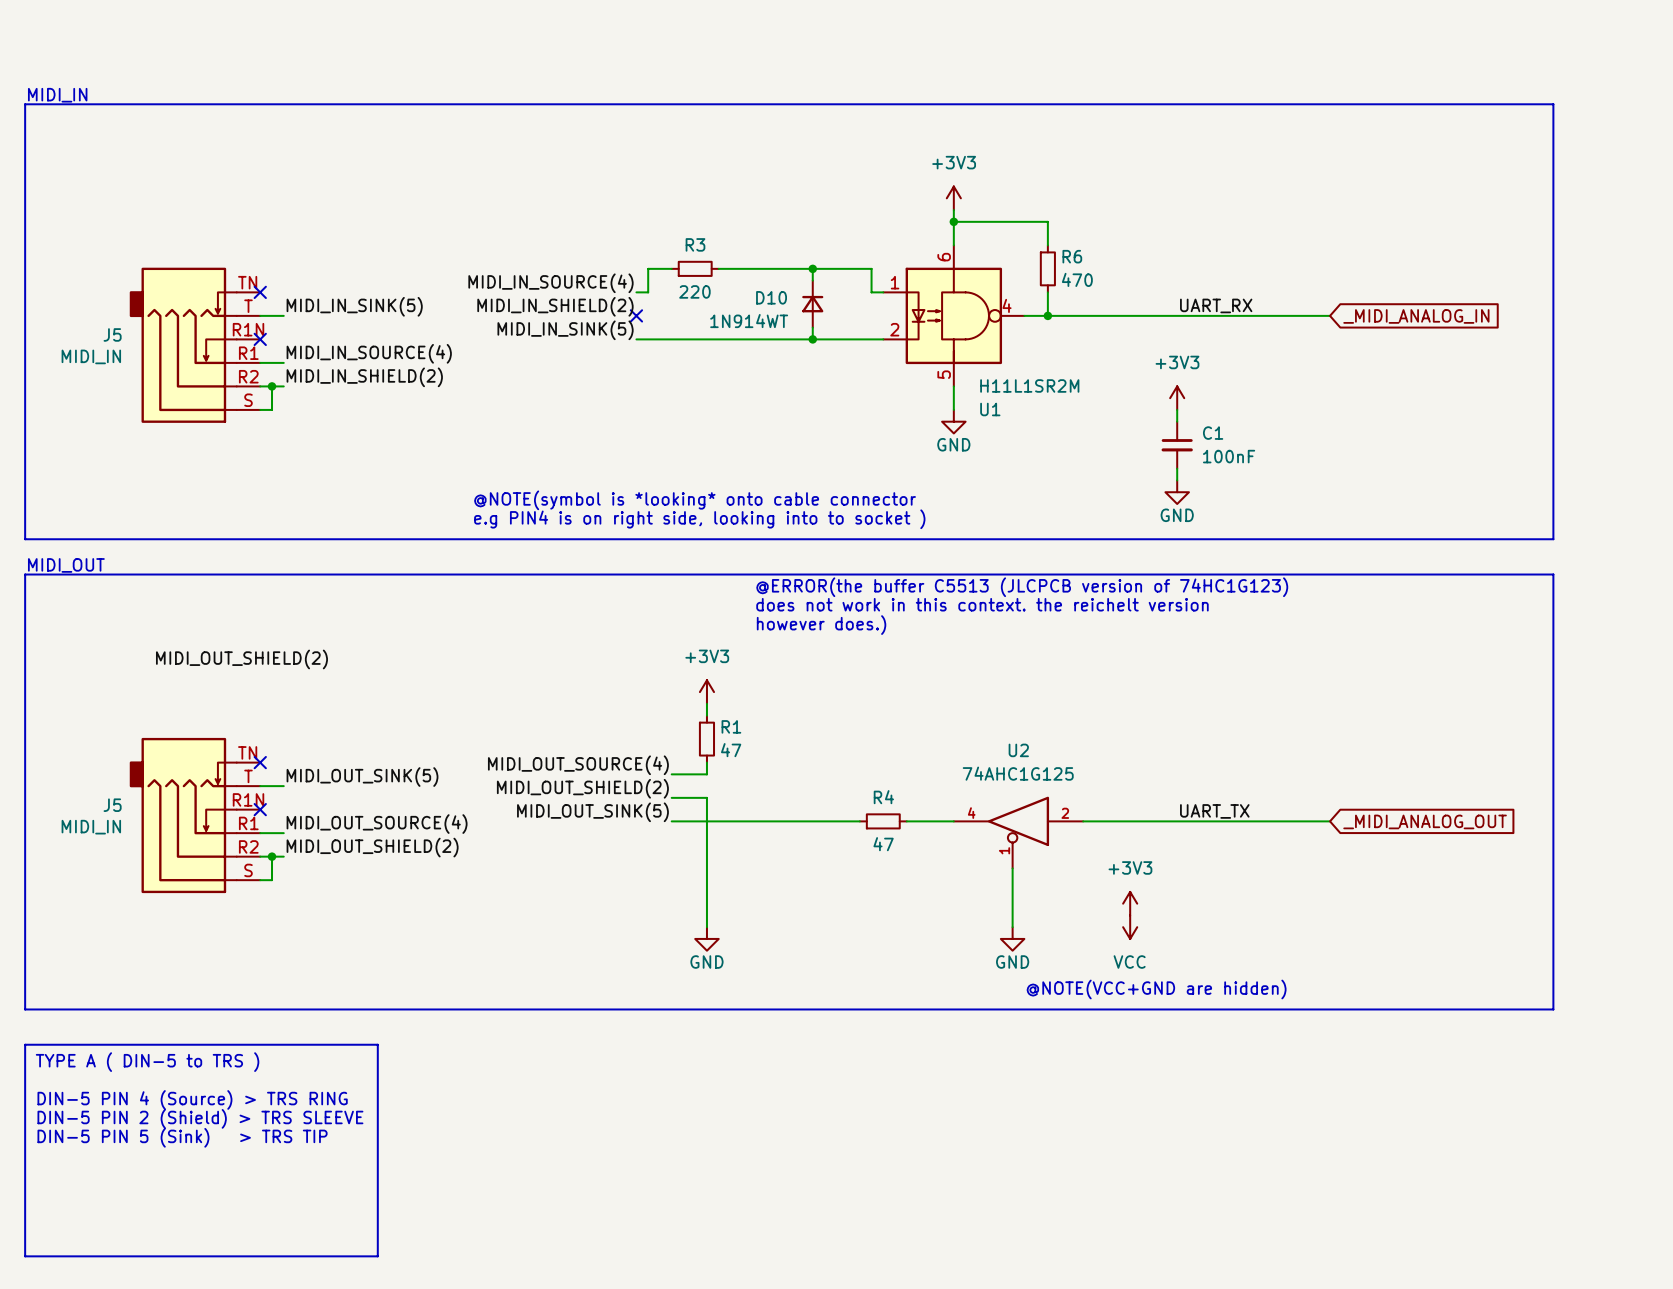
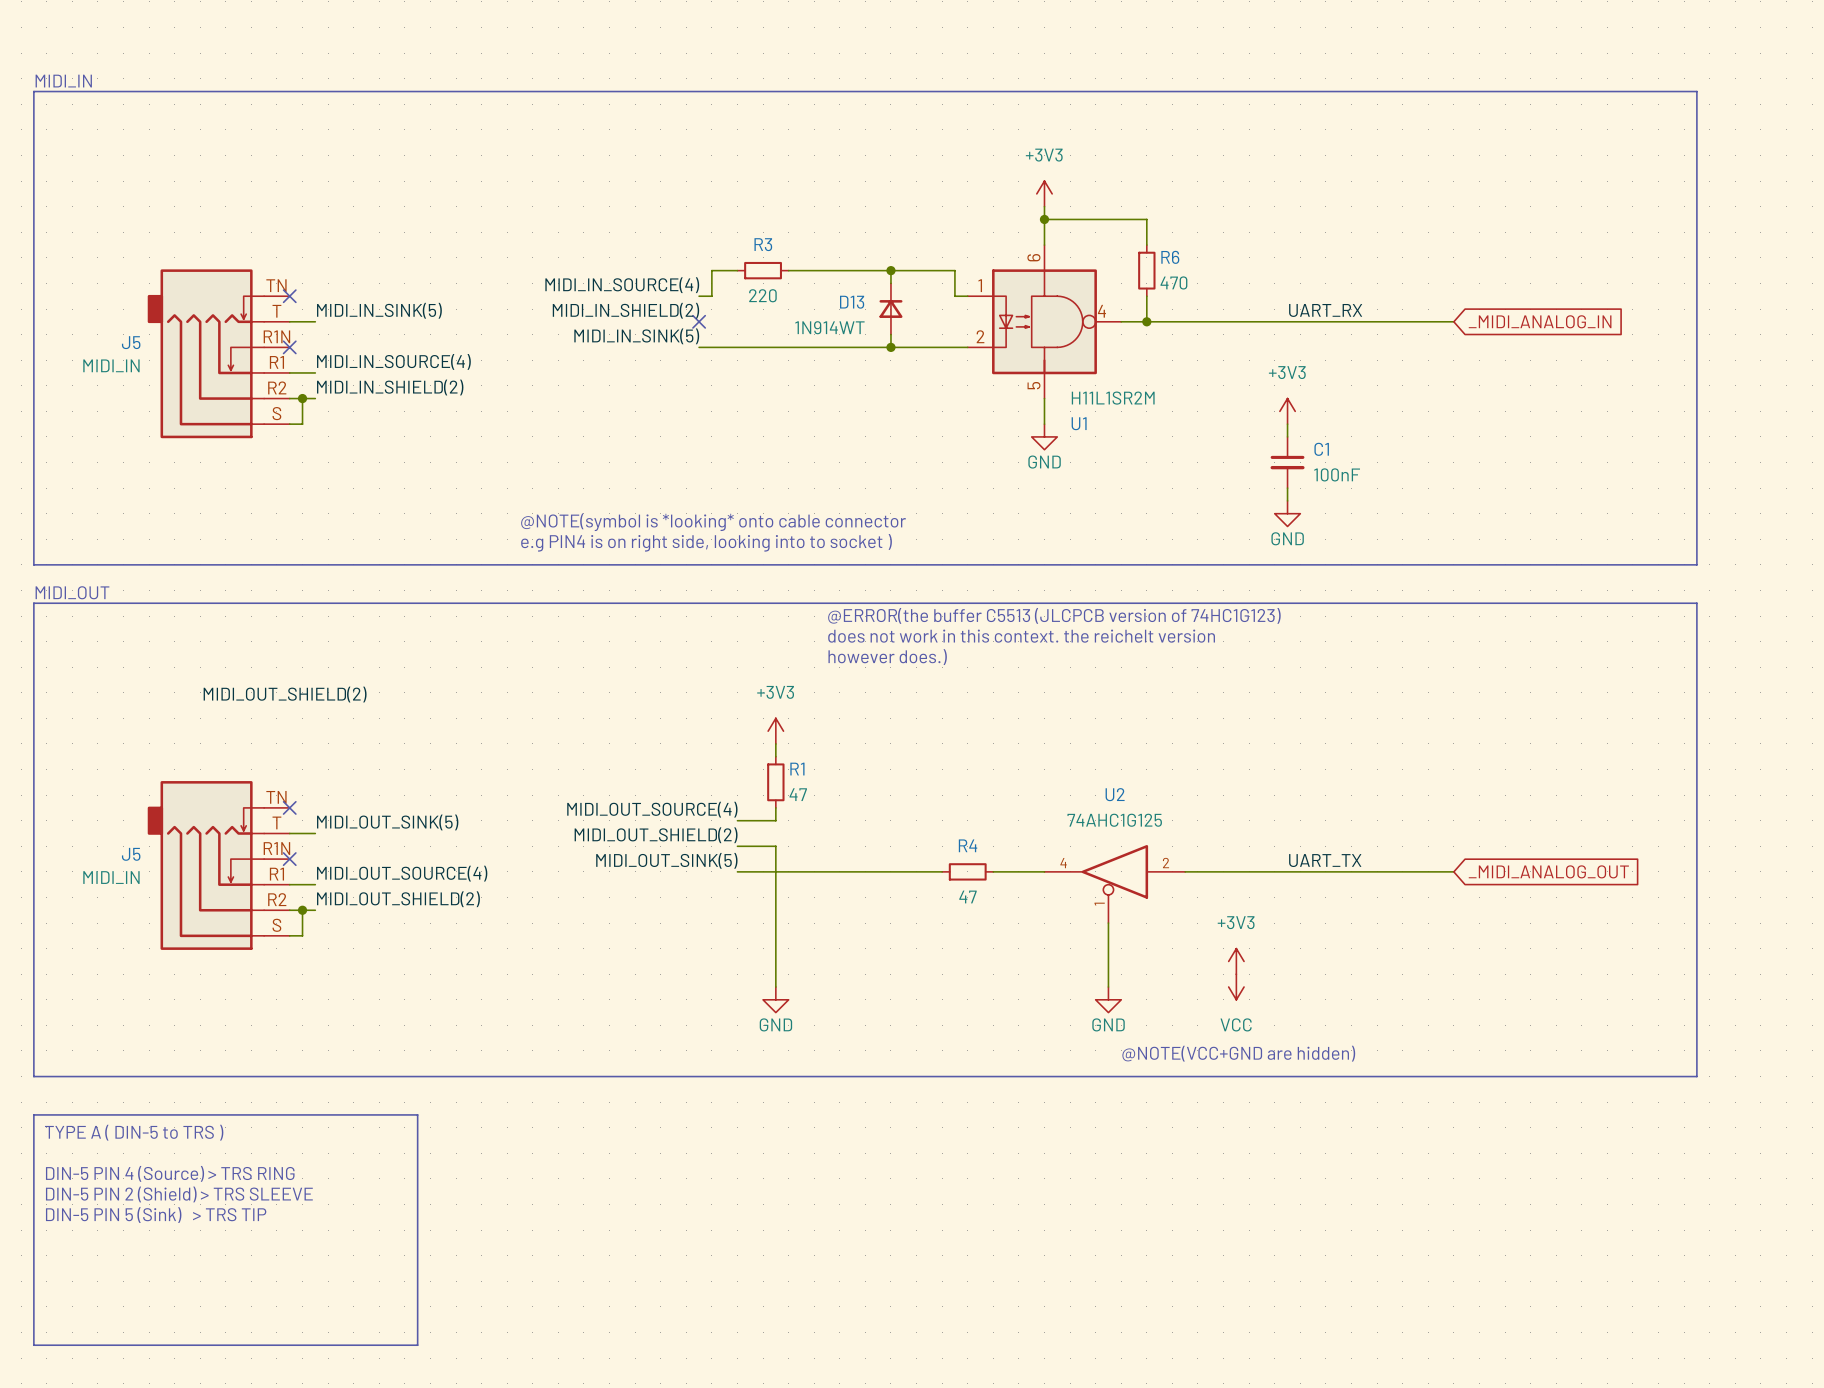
D10 name: D10 (771, 297) -> D13 (852, 302)

